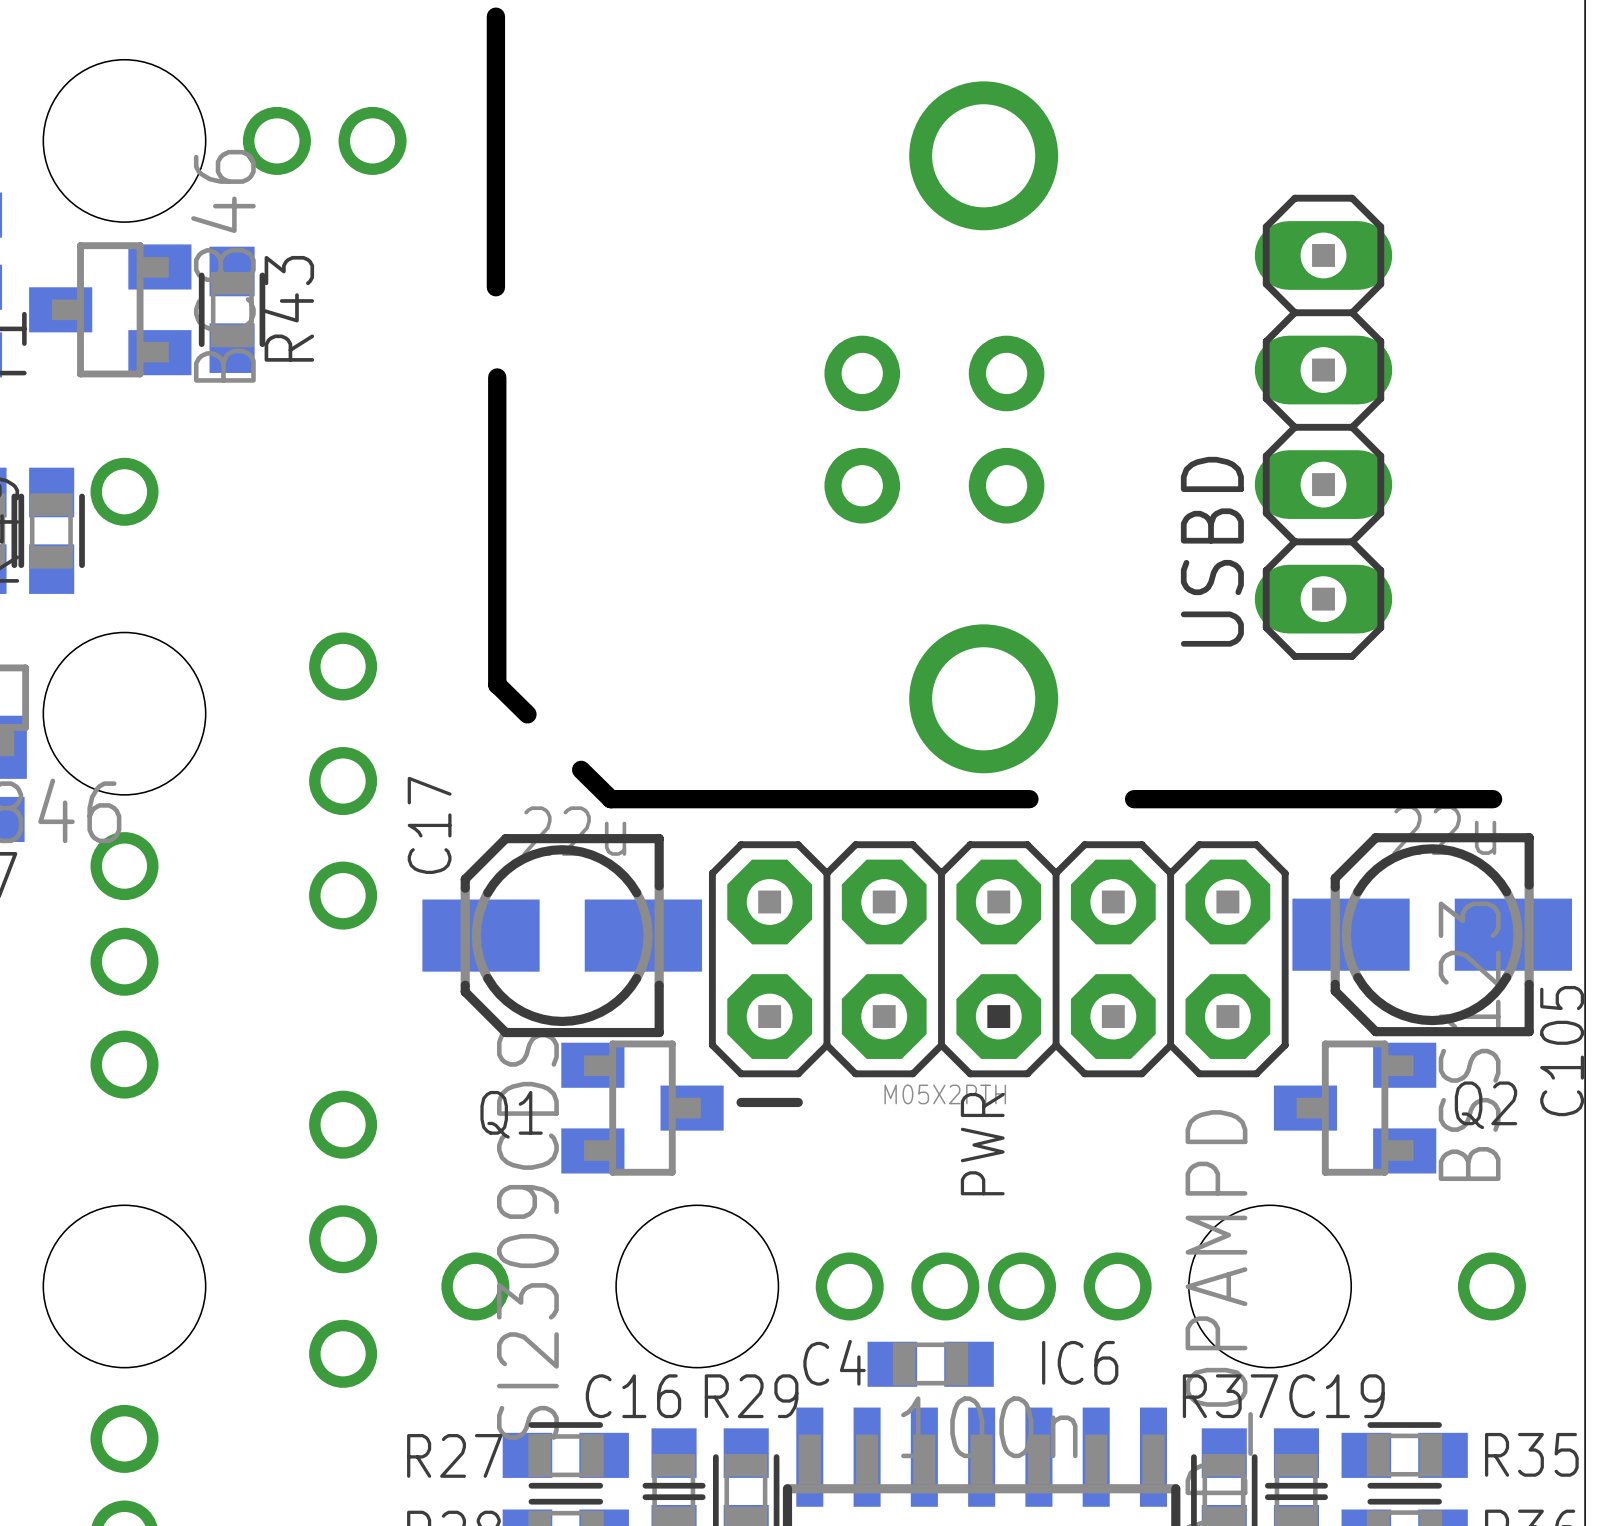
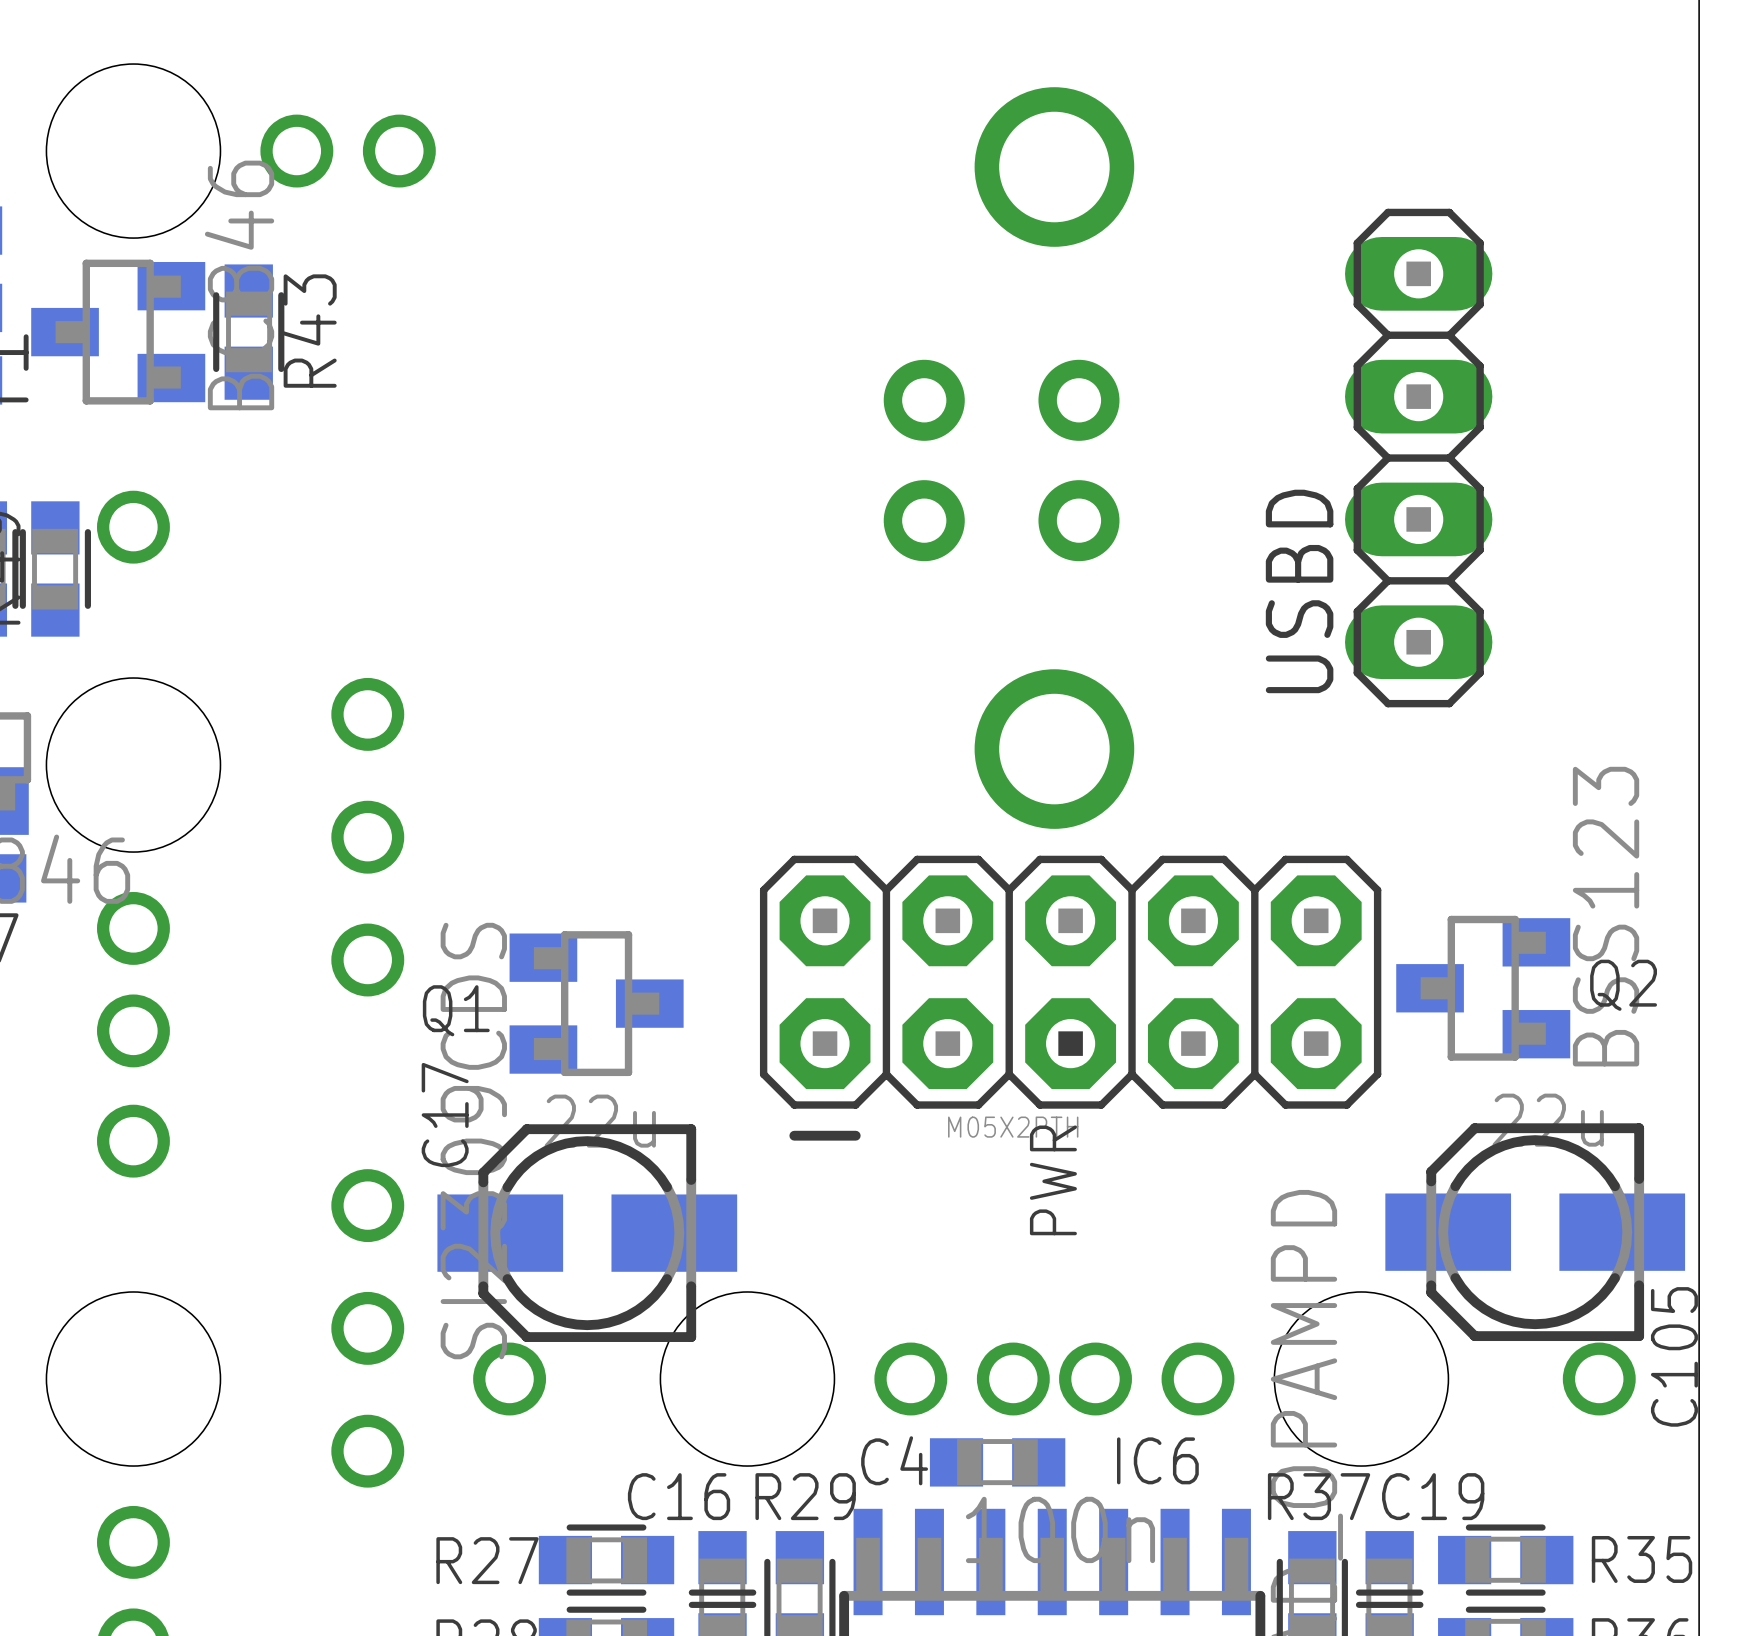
board edge: (495, 16) (495, 287) -> none
board edge: (497, 377) (497, 685) -> none
board edge: (497, 685) (527, 714) -> none
board edge: (581, 769) (610, 799) (1029, 799) -> none
board edge: (1493, 799) (1134, 799) -> none
C105 position: (1432, 934) -> (1535, 1232)
C17 position: (562, 935) -> (587, 1233)
PWR position: (998, 974) -> (1070, 998)
Q1 position: (642, 1108) -> (596, 1003)
Q2 position: (1355, 1108) -> (1483, 988)

